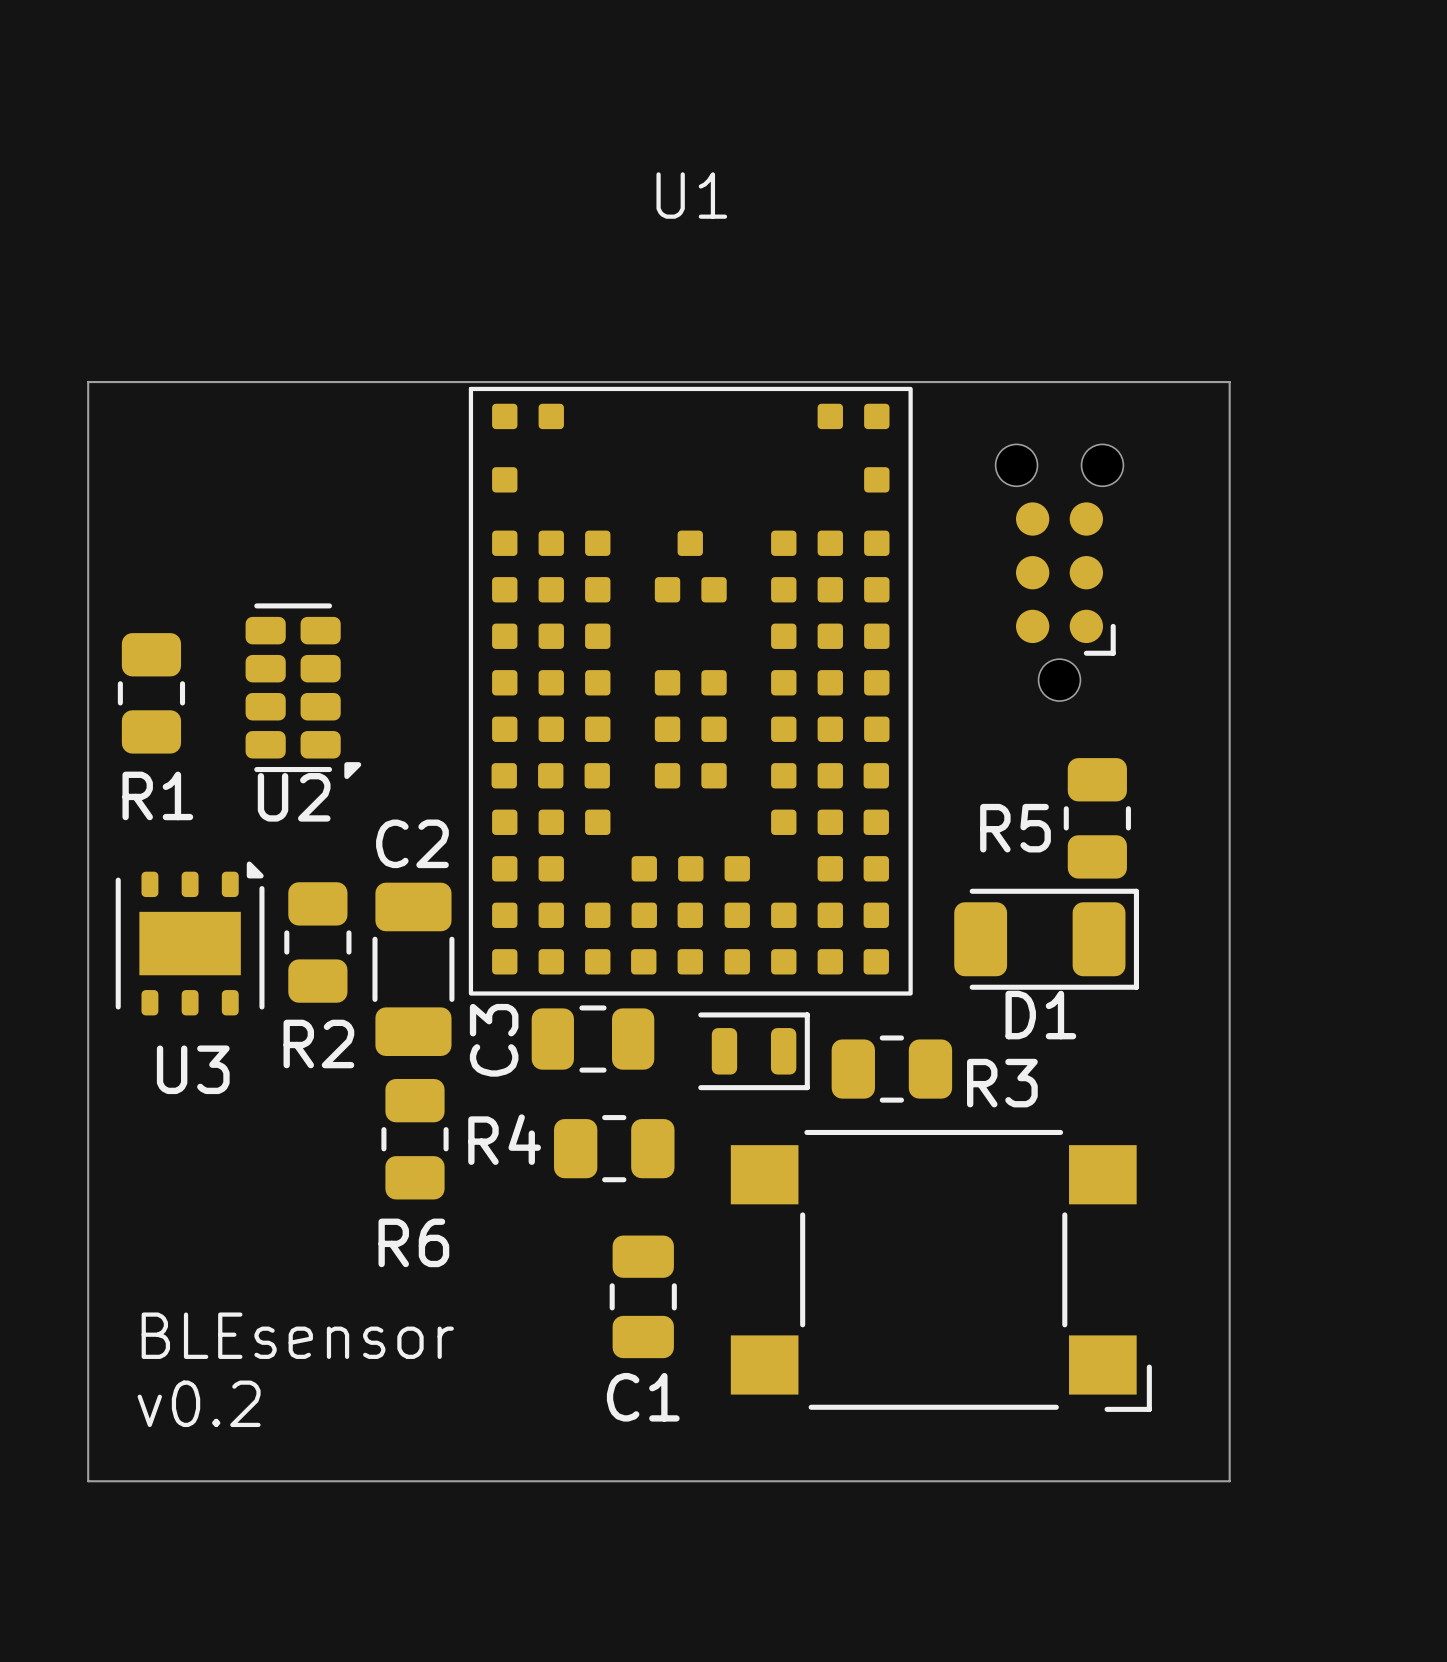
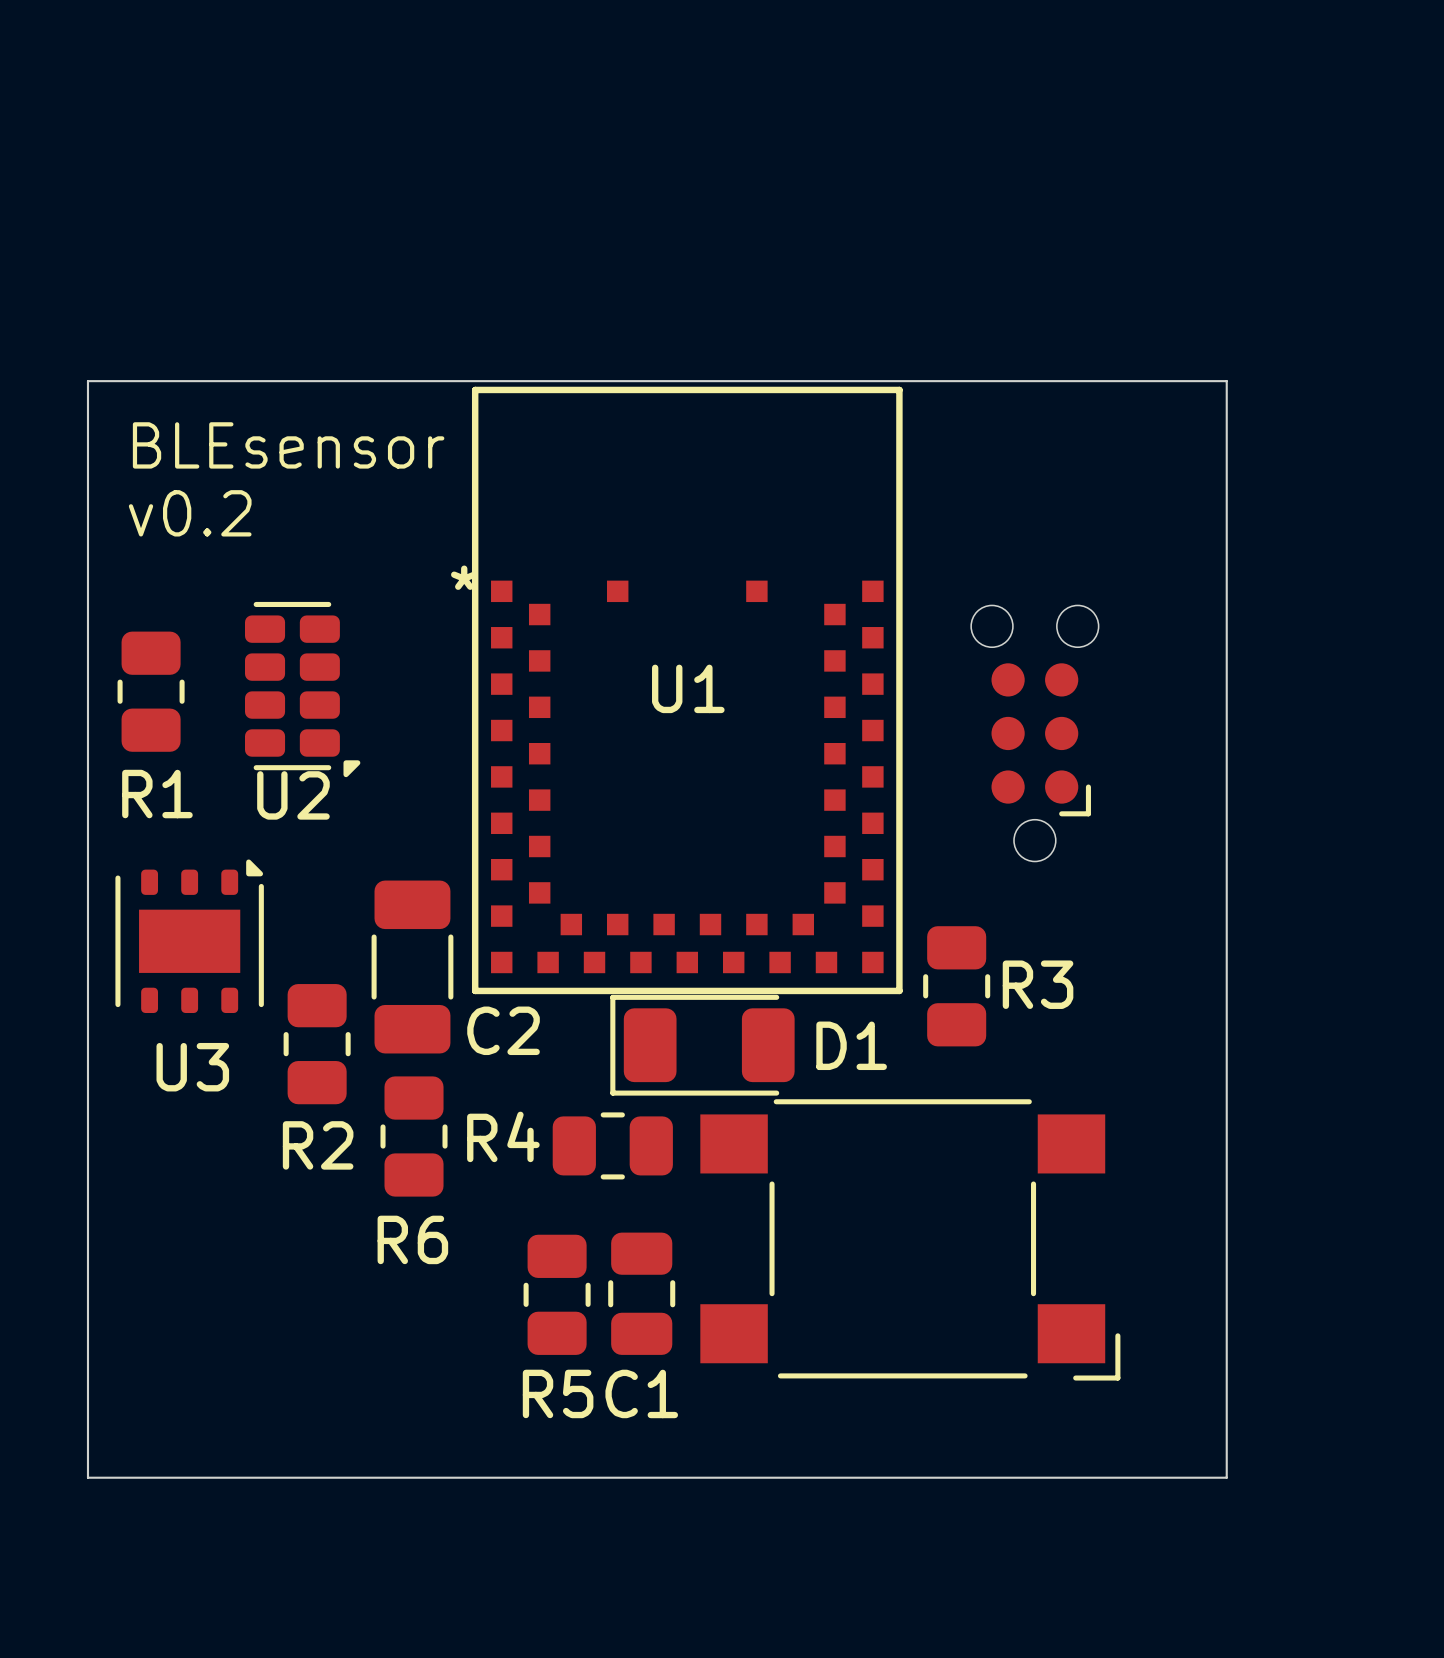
U1 name position: U1 (691, 195) -> U1 (688, 688)
U1 footprint: [468, 386, 913, 996] -> [471, 386, 903, 995]
part position: (1059, 572) -> (1034, 733)
R5 position: (1097, 818) -> (557, 1294)
R5 name position: R5 (1015, 828) -> R5 (558, 1393)
C2 name position: C2 (412, 843) -> C2 (503, 1030)
D1 rotation: 0° (1046, 939) -> 180° (702, 1045)
D1 position: (1046, 939) -> (702, 1045)
R2 position: (317, 942) -> (317, 1044)
D1 name position: D1 (1040, 1015) -> D1 (851, 1045)
C3: (592, 1039) -> none
part: (754, 1051) -> none
R3 rotation: 0° (891, 1069) -> 90° clockwise (956, 986)
R3 position: (891, 1069) -> (956, 986)
part position: (941, 1270) -> (910, 1239)
text position: BLEsensor (297, 1335) -> BLEsensor (288, 445)
text position: v0.2 (199, 1403) -> v0.2 (190, 513)

